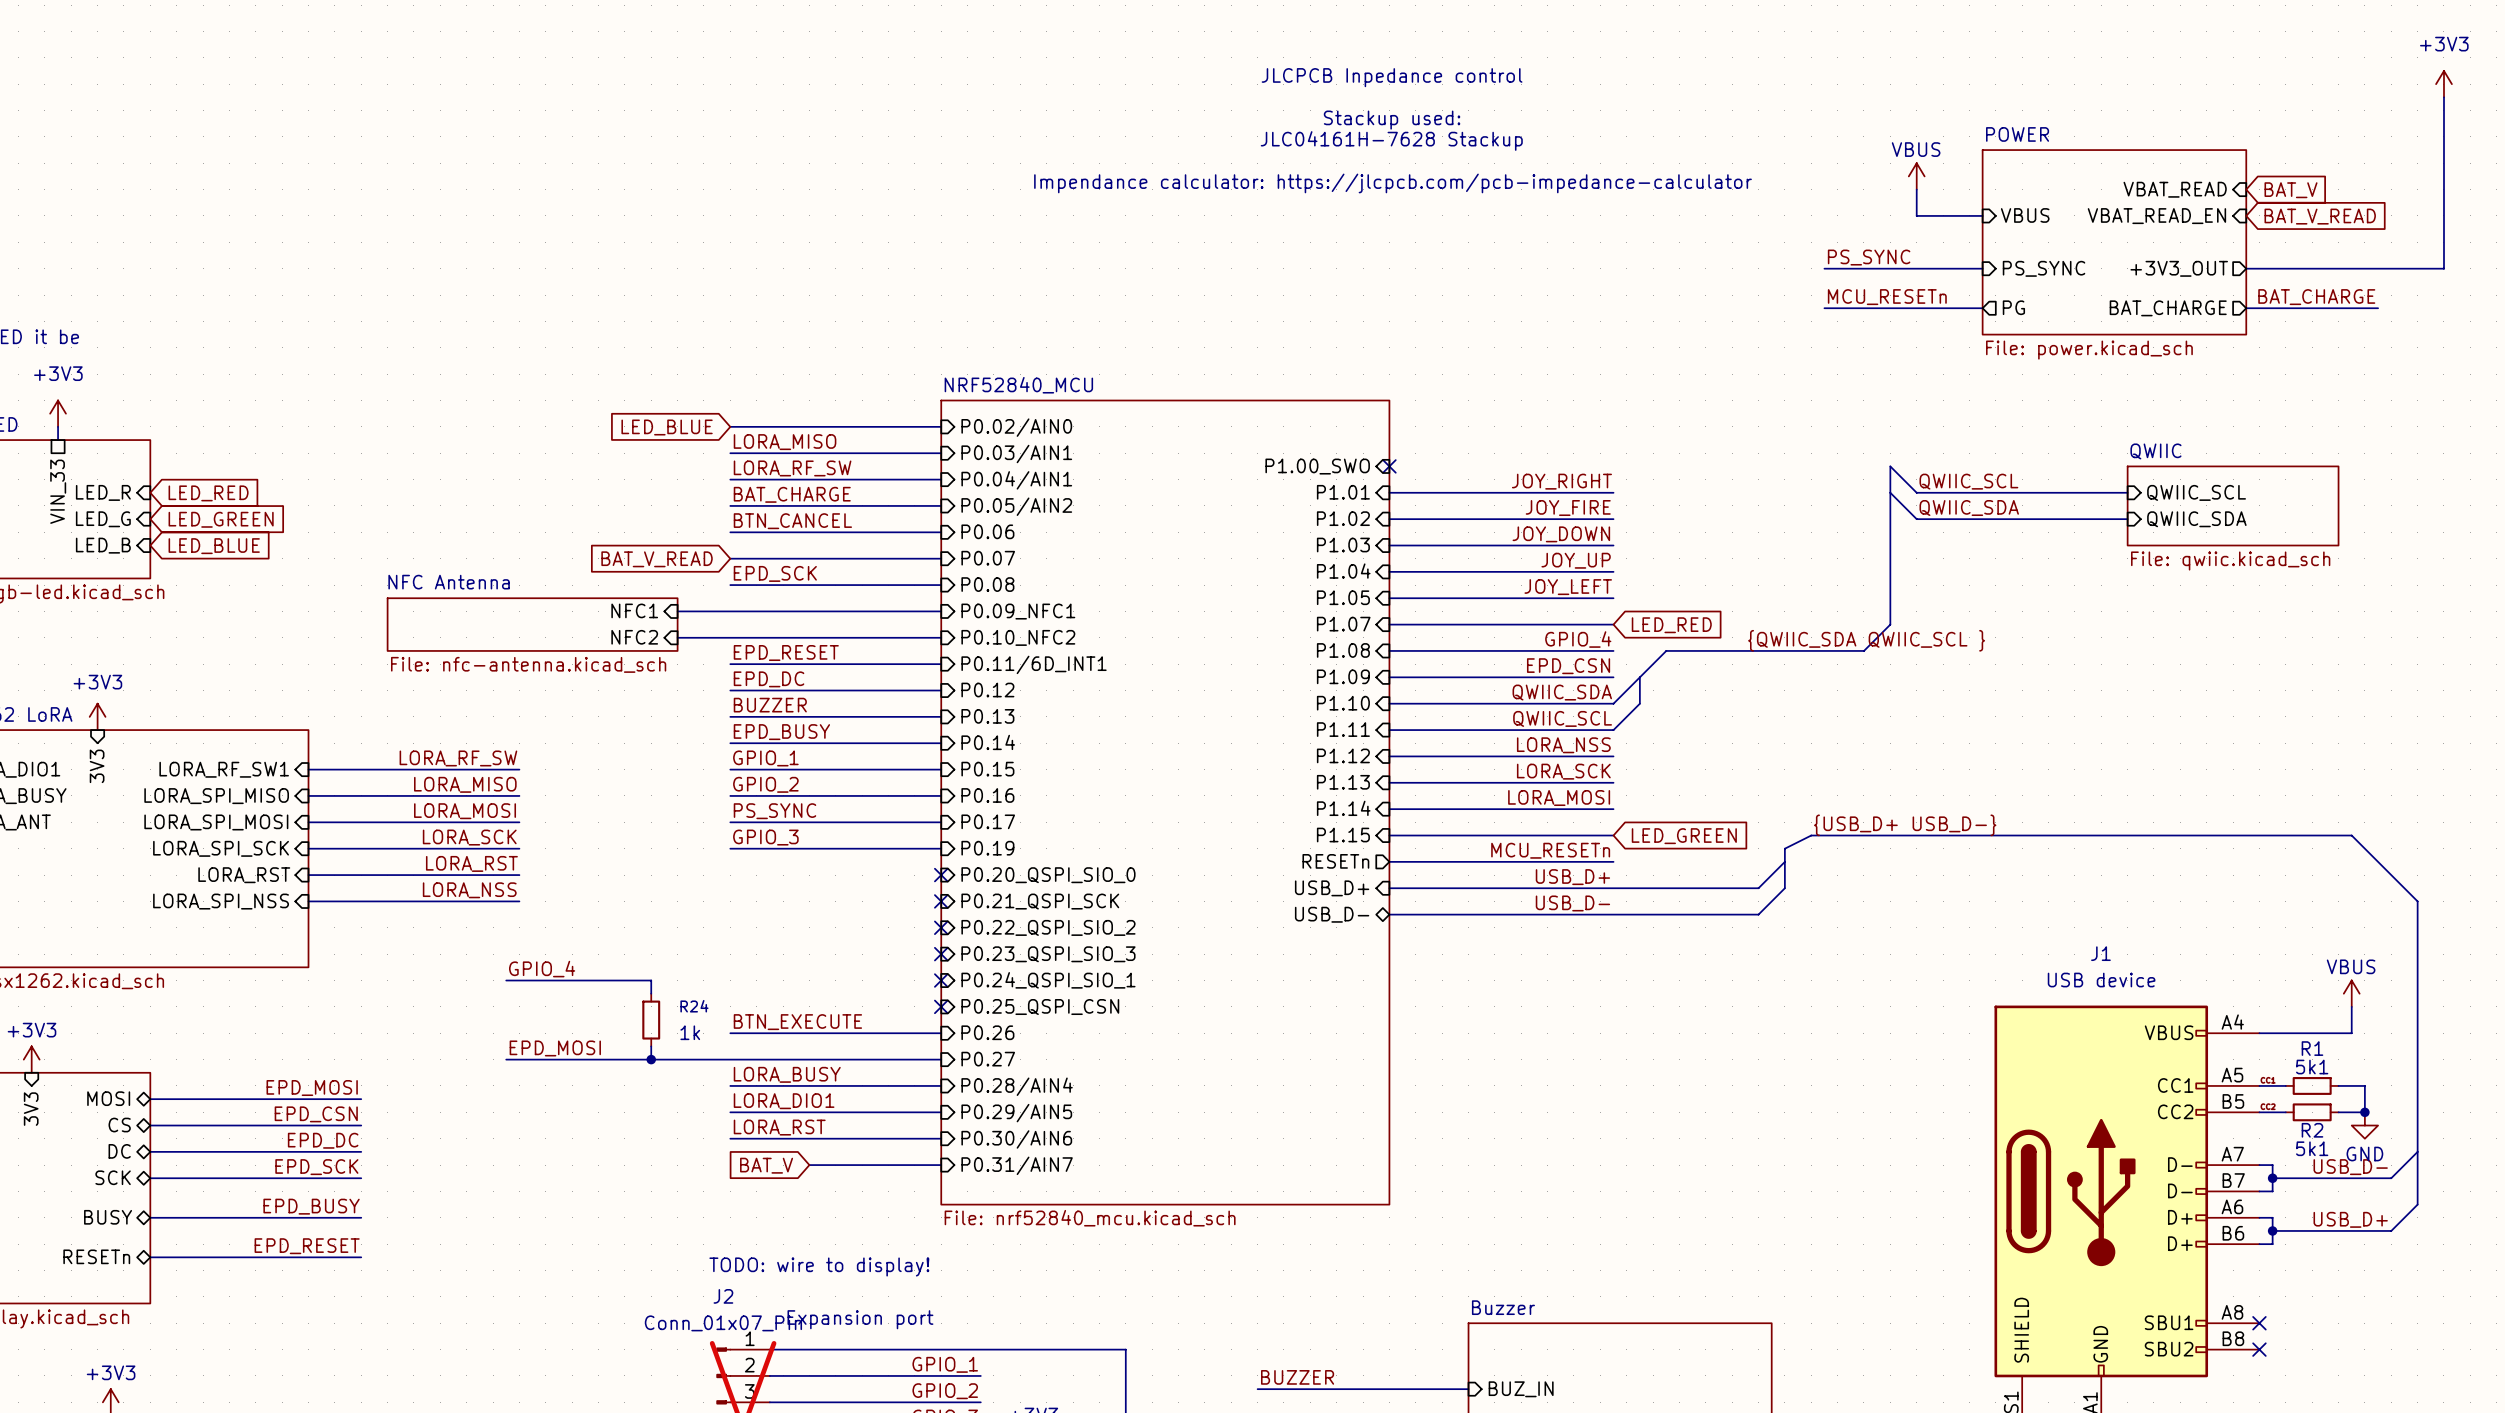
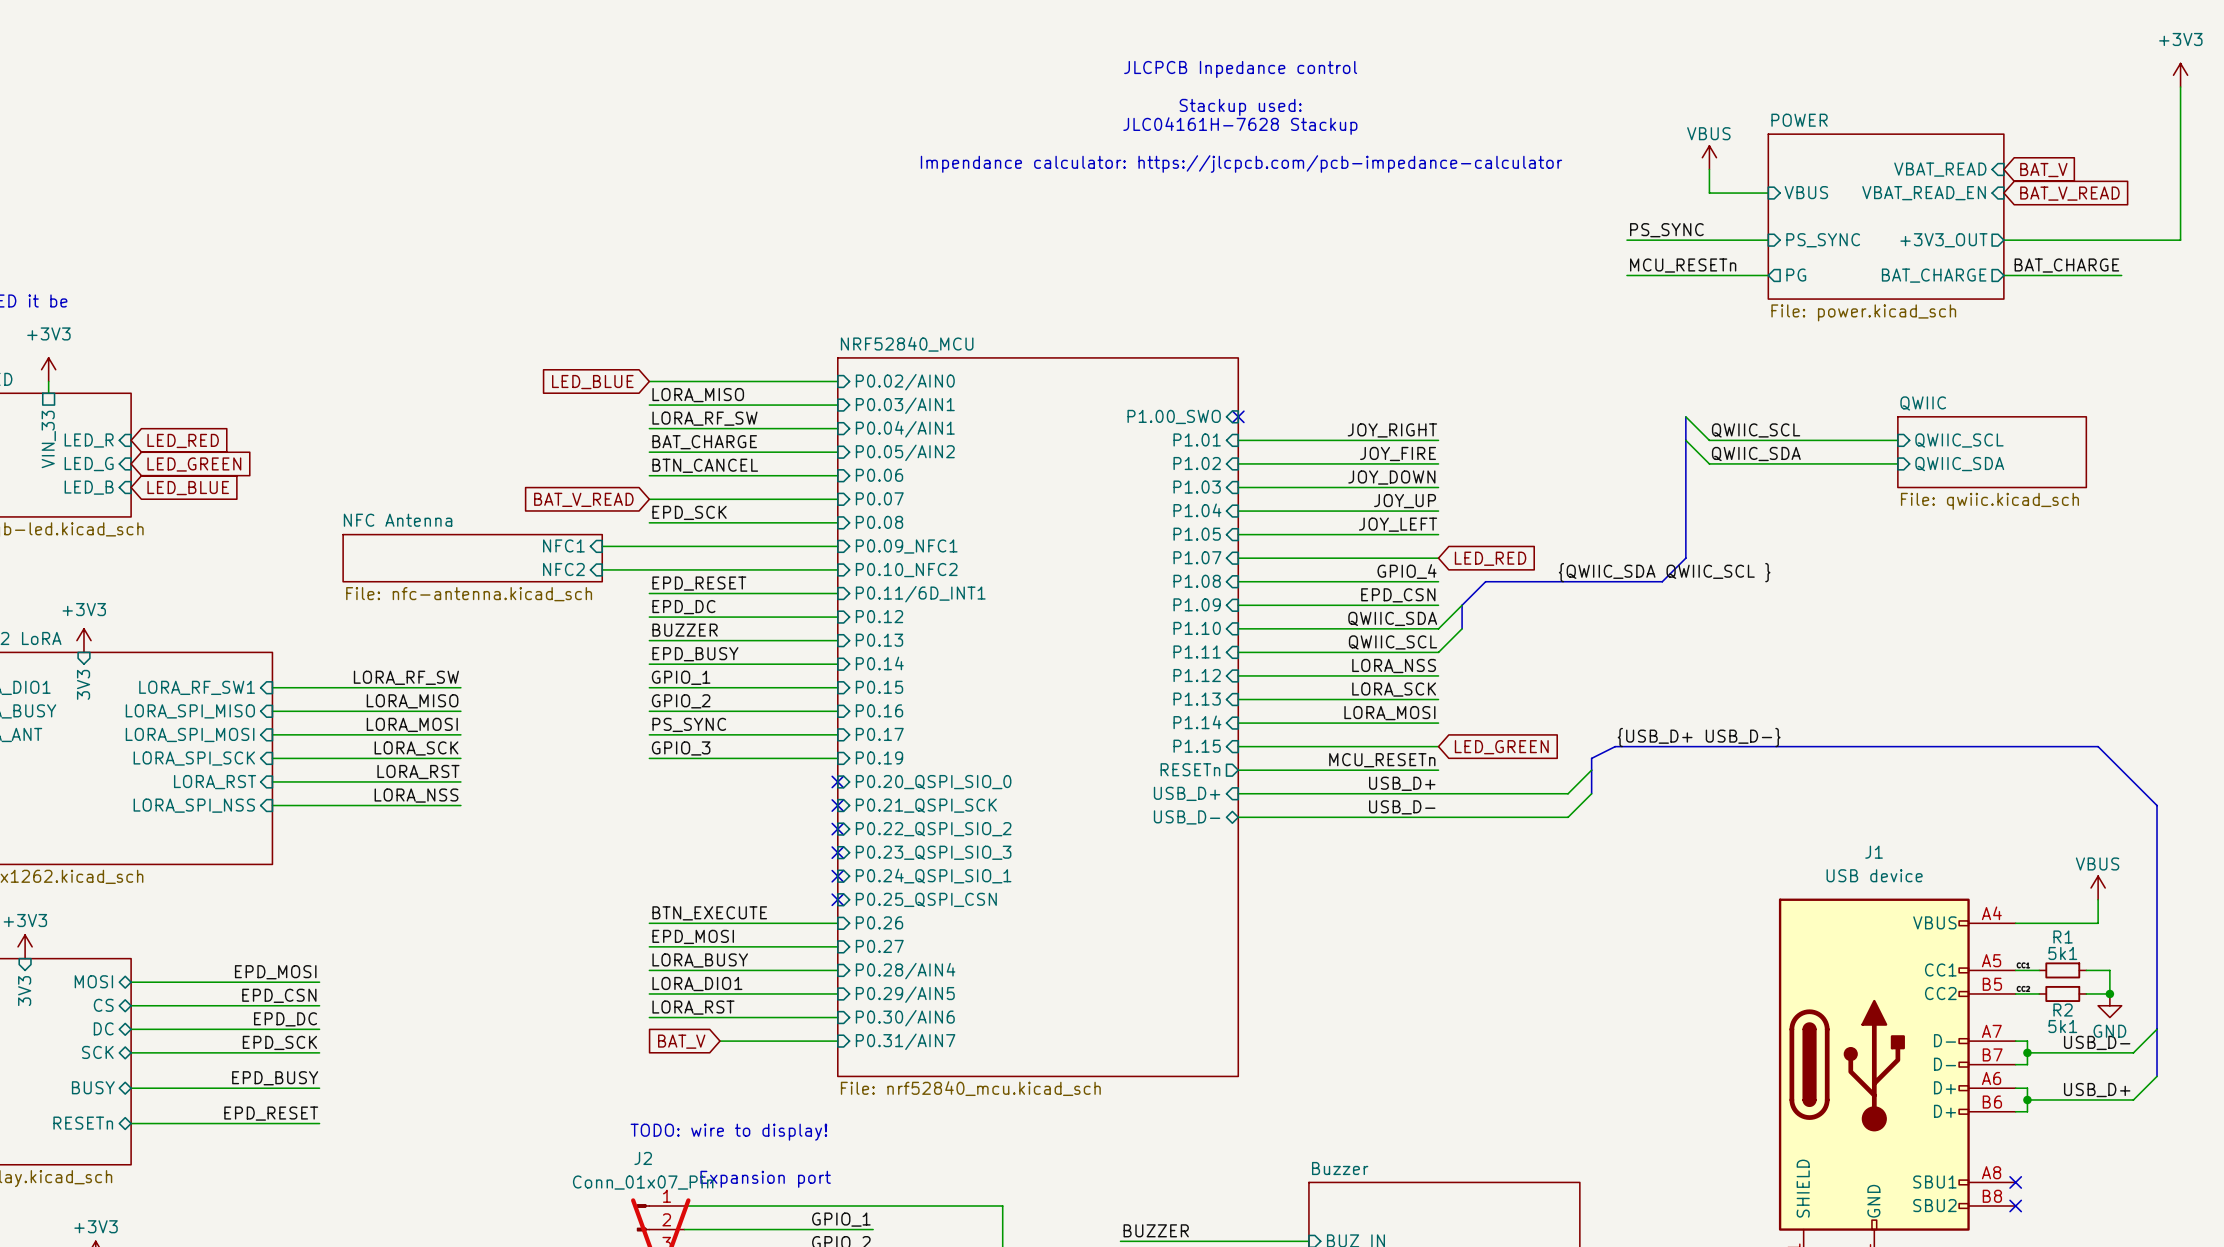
label: GPIO_4 (542, 969) -> none
wire: (506, 980) (651, 980) (651, 993) -> none
R24: 1k (651, 1020) -> none
wire: (651, 1046) (651, 1059) -> none
label position: EPD_MOSI (555, 1048) -> EPD_MOSI (693, 936)
wire: (506, 1059) (730, 1059) -> none
junction: (651, 1059) -> none

